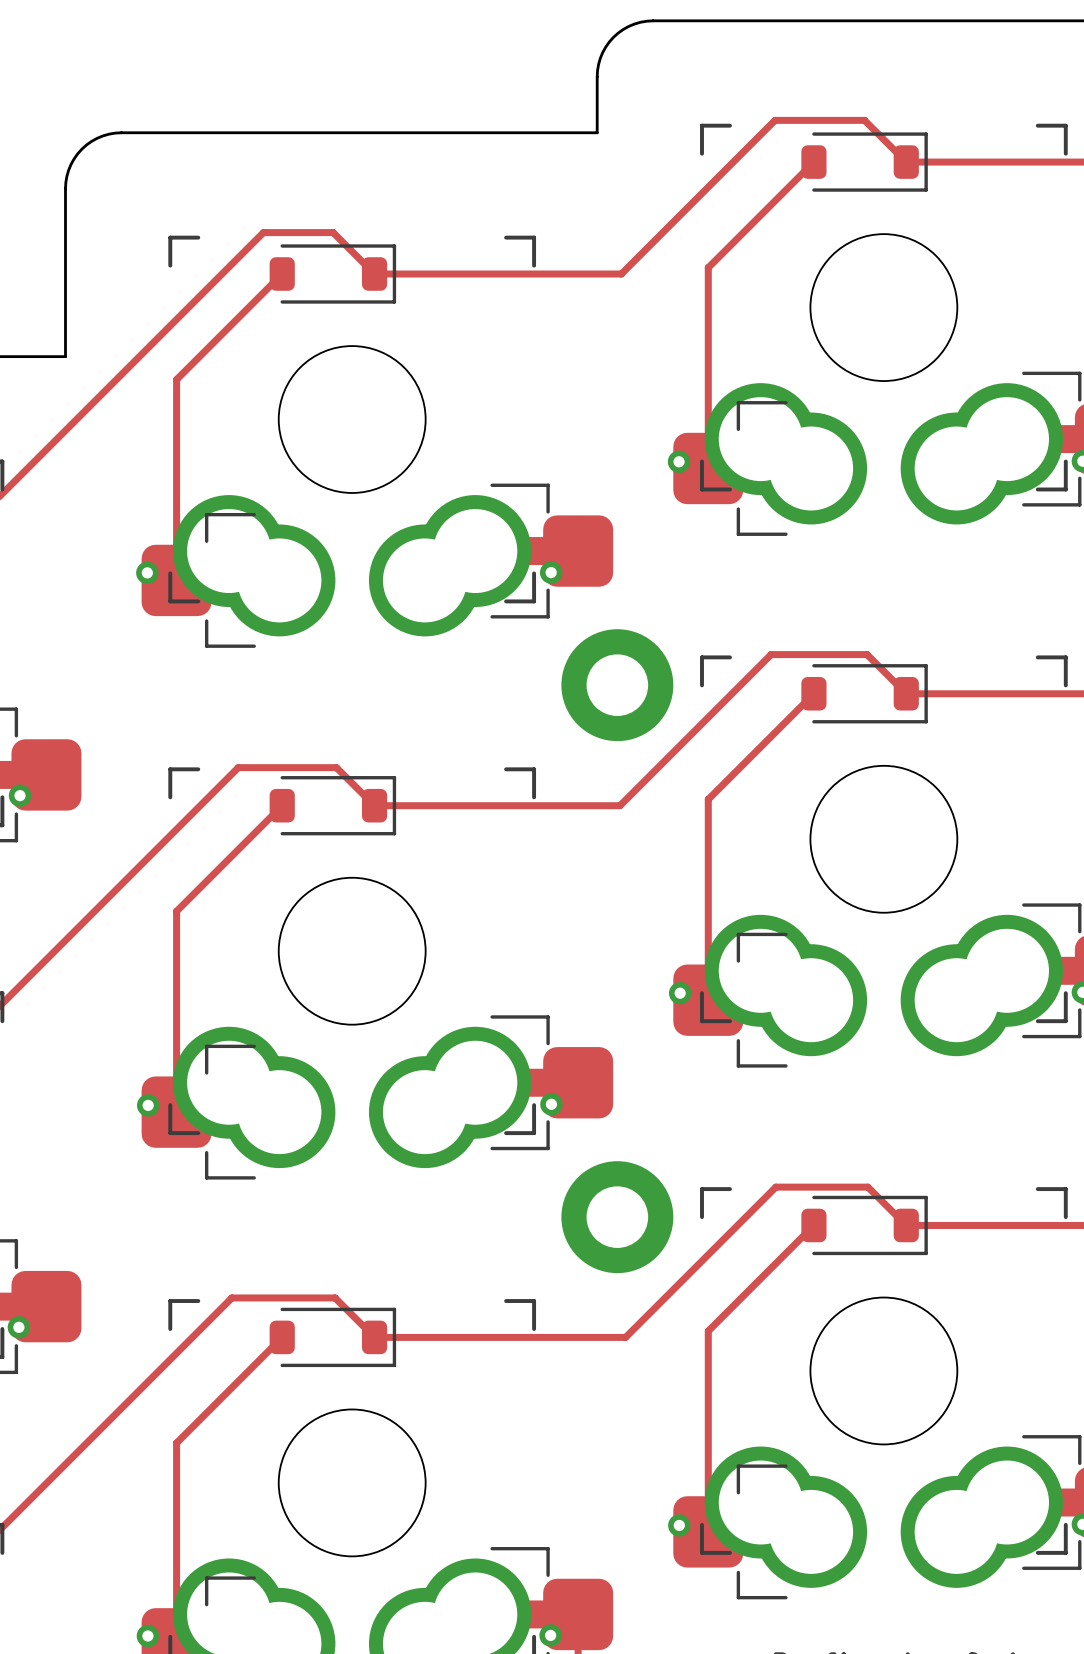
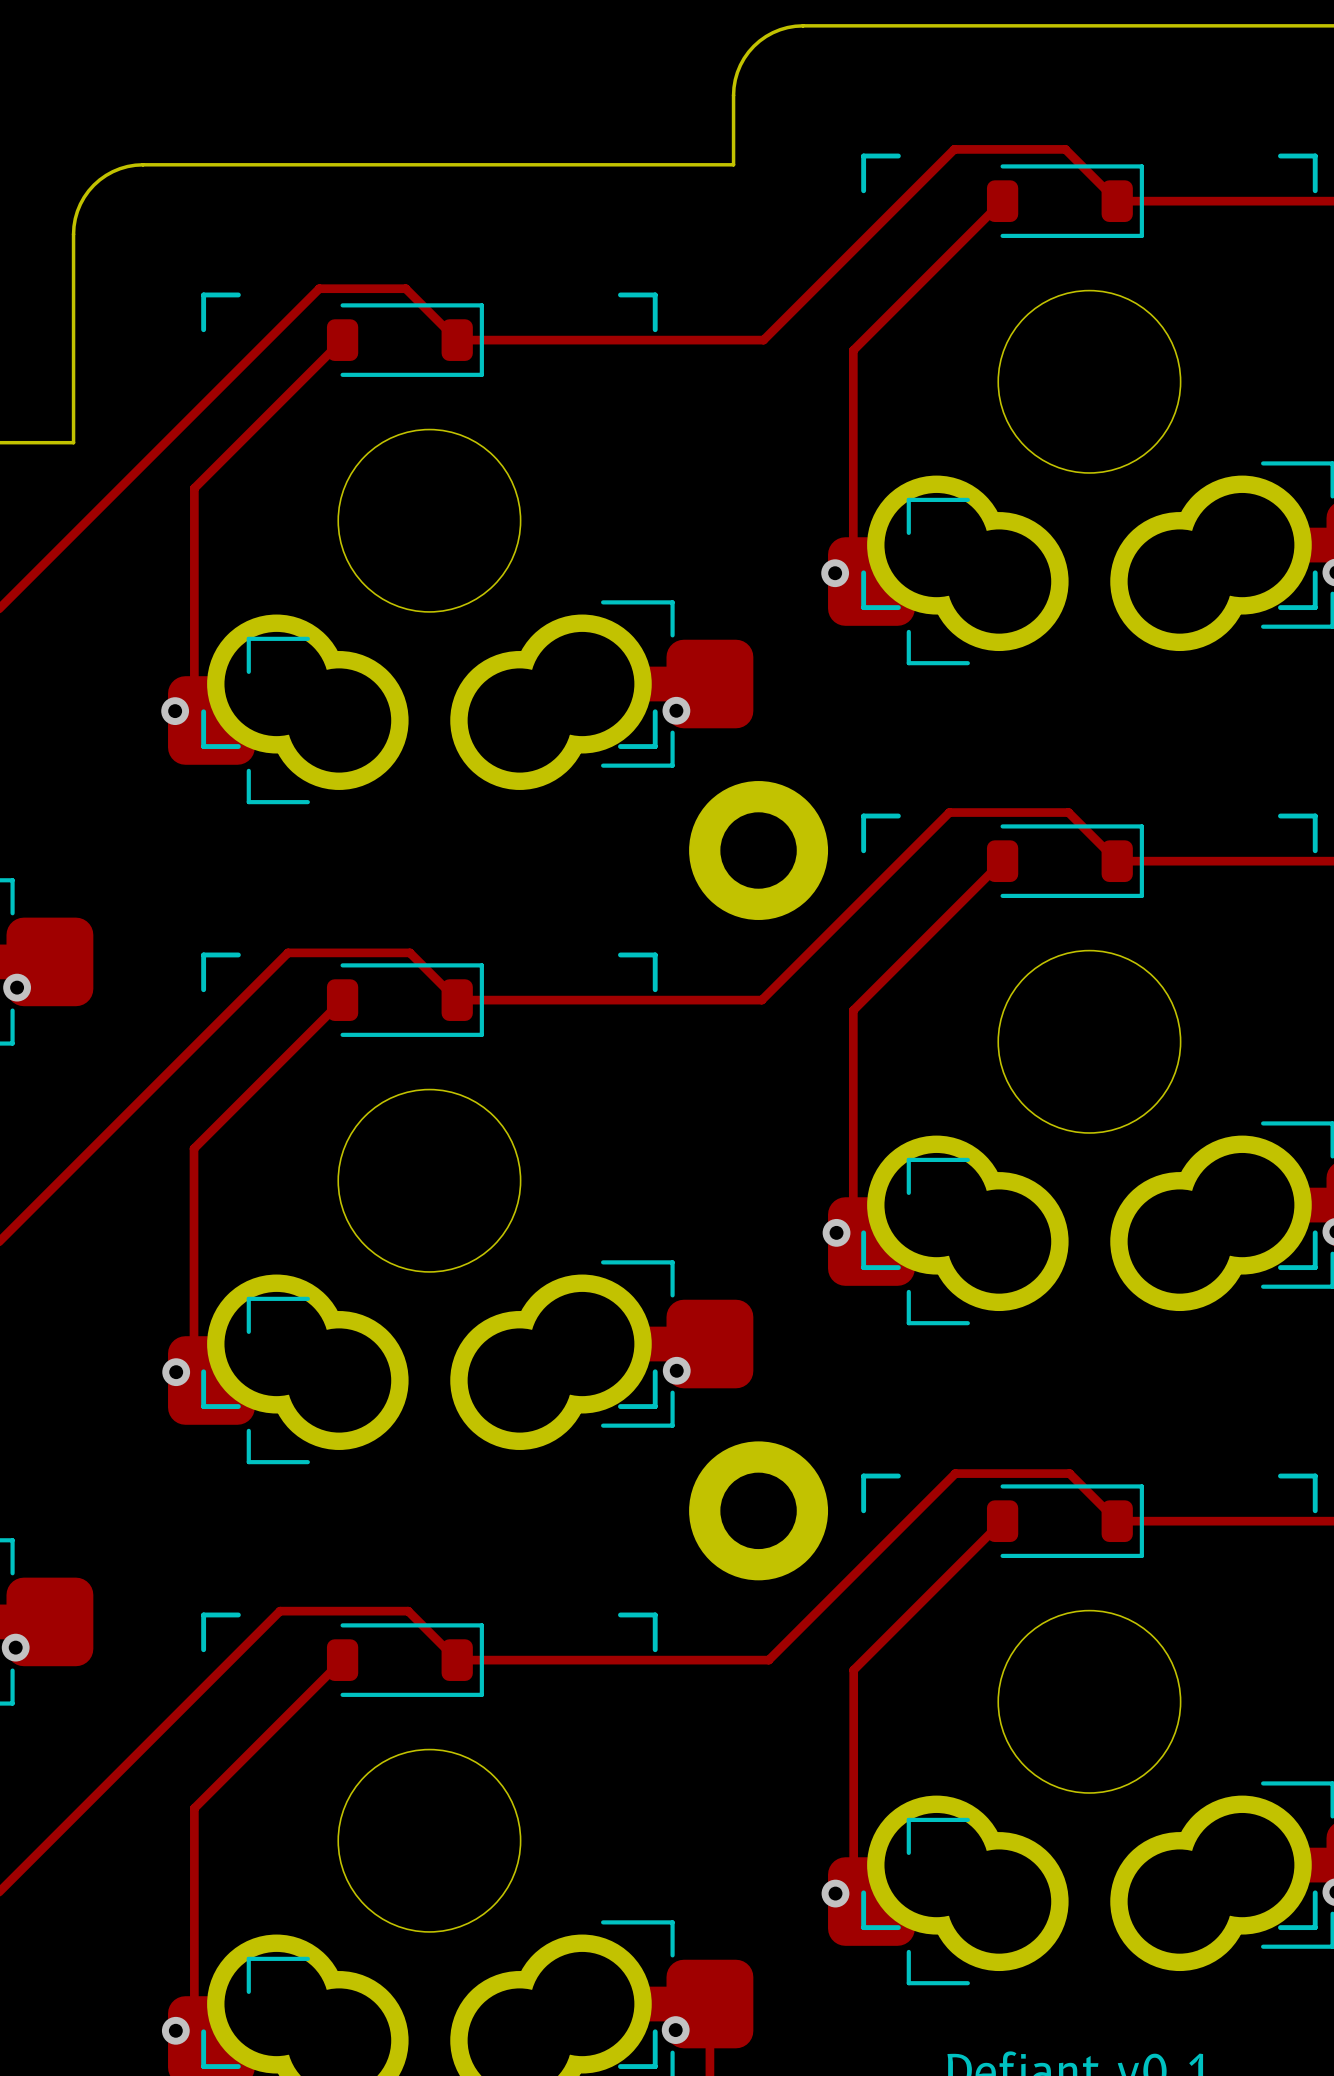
track: (708, 267) (708, 468) -> (871, 332) (853, 350) (853, 563) (871, 581)
track: (176, 379) (176, 580) -> (211, 471) (194, 488) (194, 703) (211, 720)
track: (708, 799) (708, 1000) -> (871, 992) (853, 1010) (853, 1223) (871, 1241)
track: (176, 911) (176, 1112) -> (211, 1131) (194, 1148) (194, 1363) (211, 1380)
track: (708, 1331) (708, 1531) -> (871, 1652) (853, 1670) (853, 1883) (871, 1901)
track: (176, 1443) (176, 1643) -> (211, 1791) (194, 1808) (194, 2023) (211, 2040)

